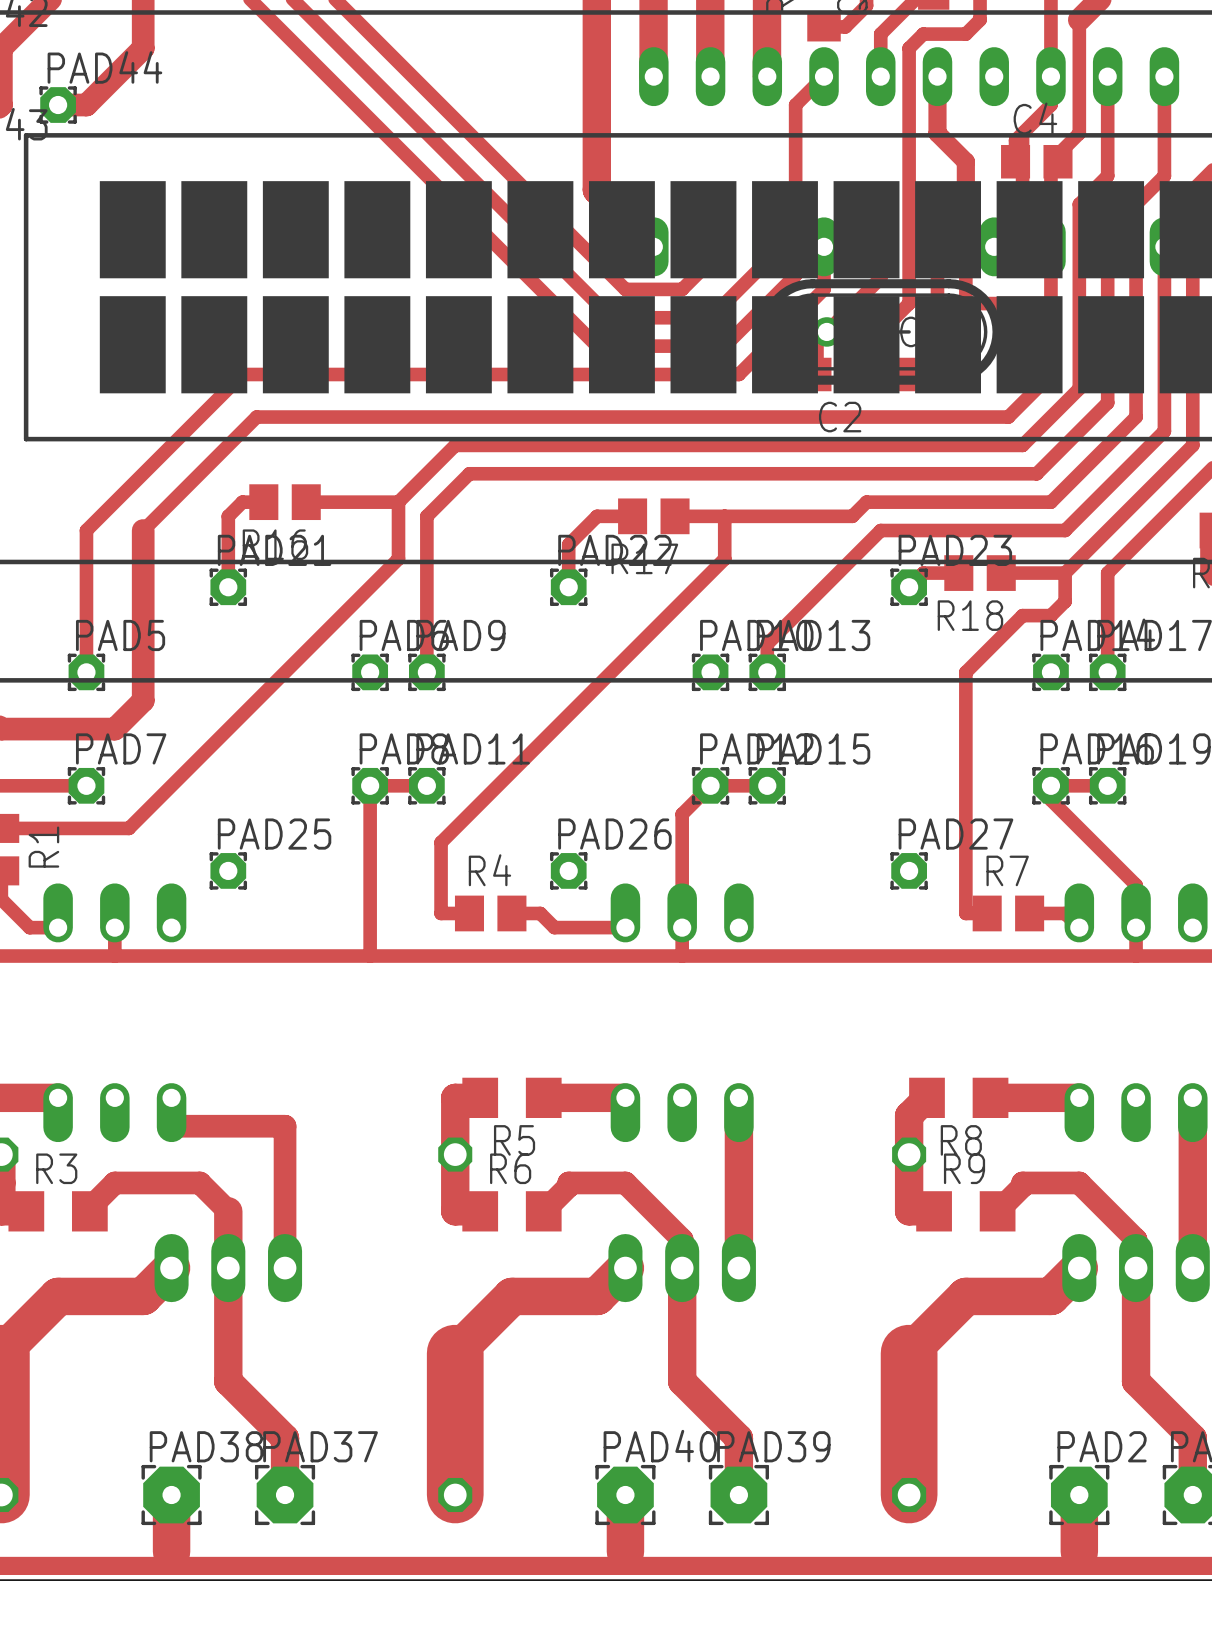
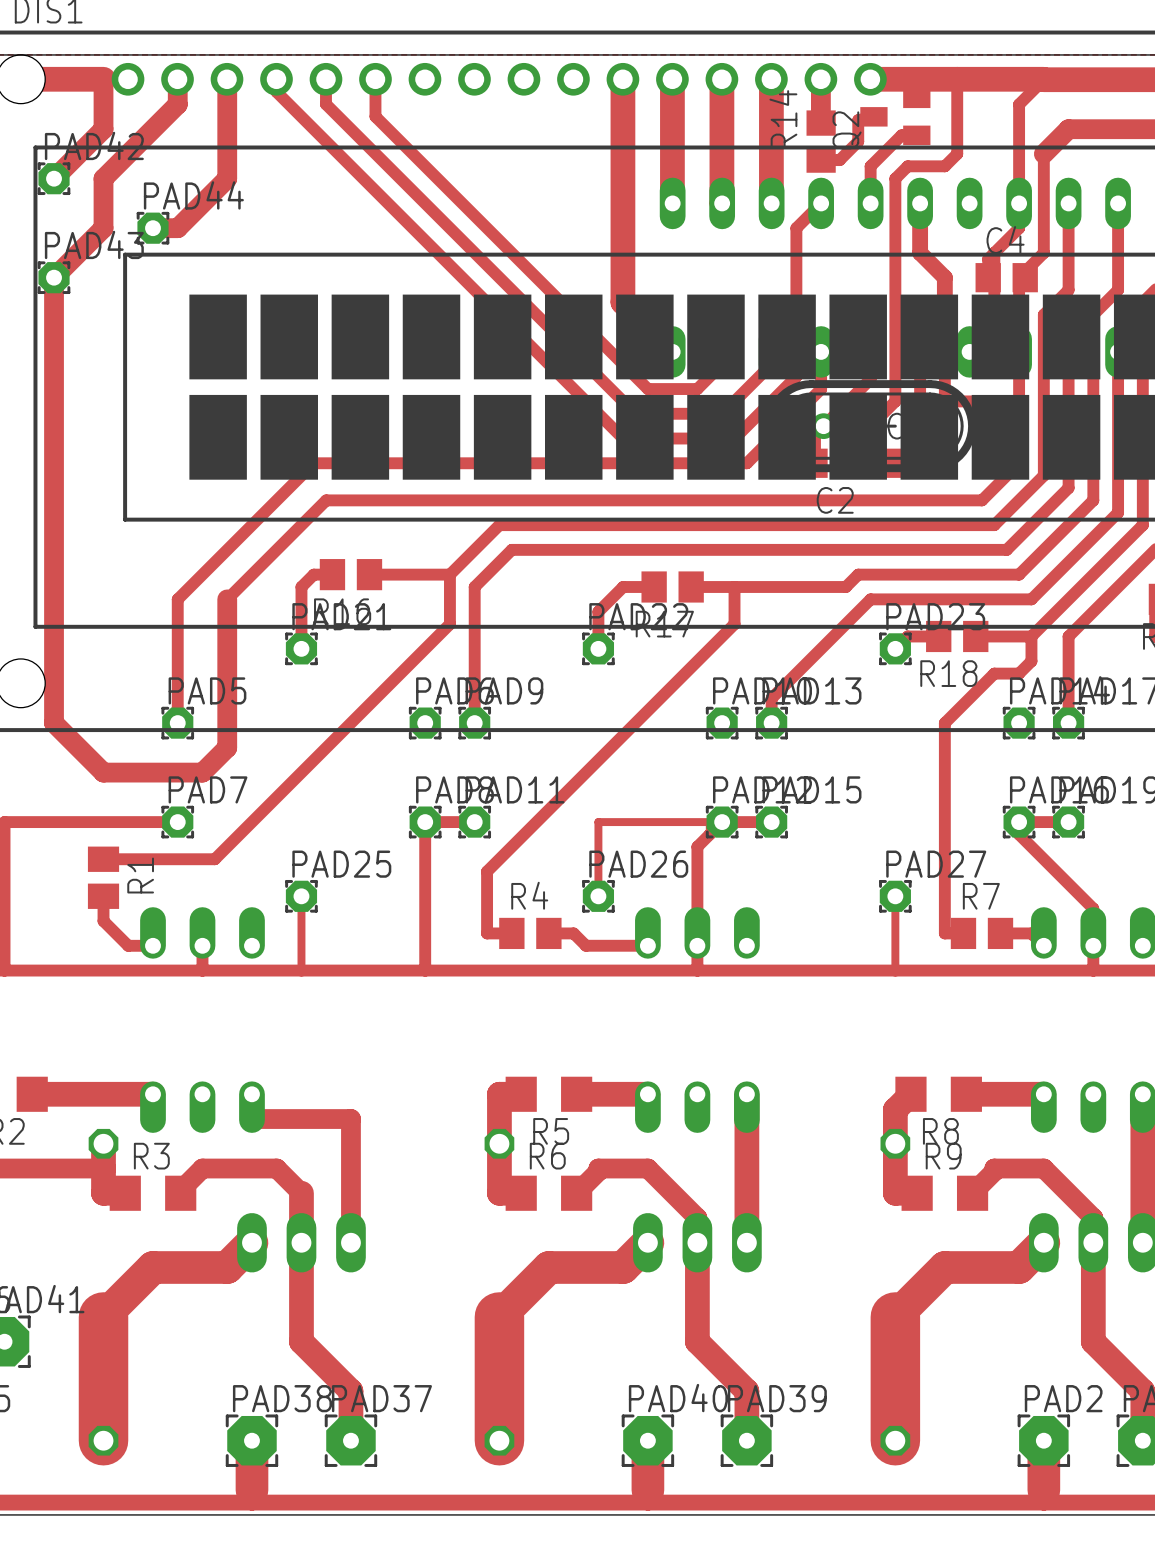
track: none -> (709, 834) (709, 822) (598, 822) (598, 896)
track: none -> (301, 896) (301, 970)
track: none -> (895, 896) (895, 970)

